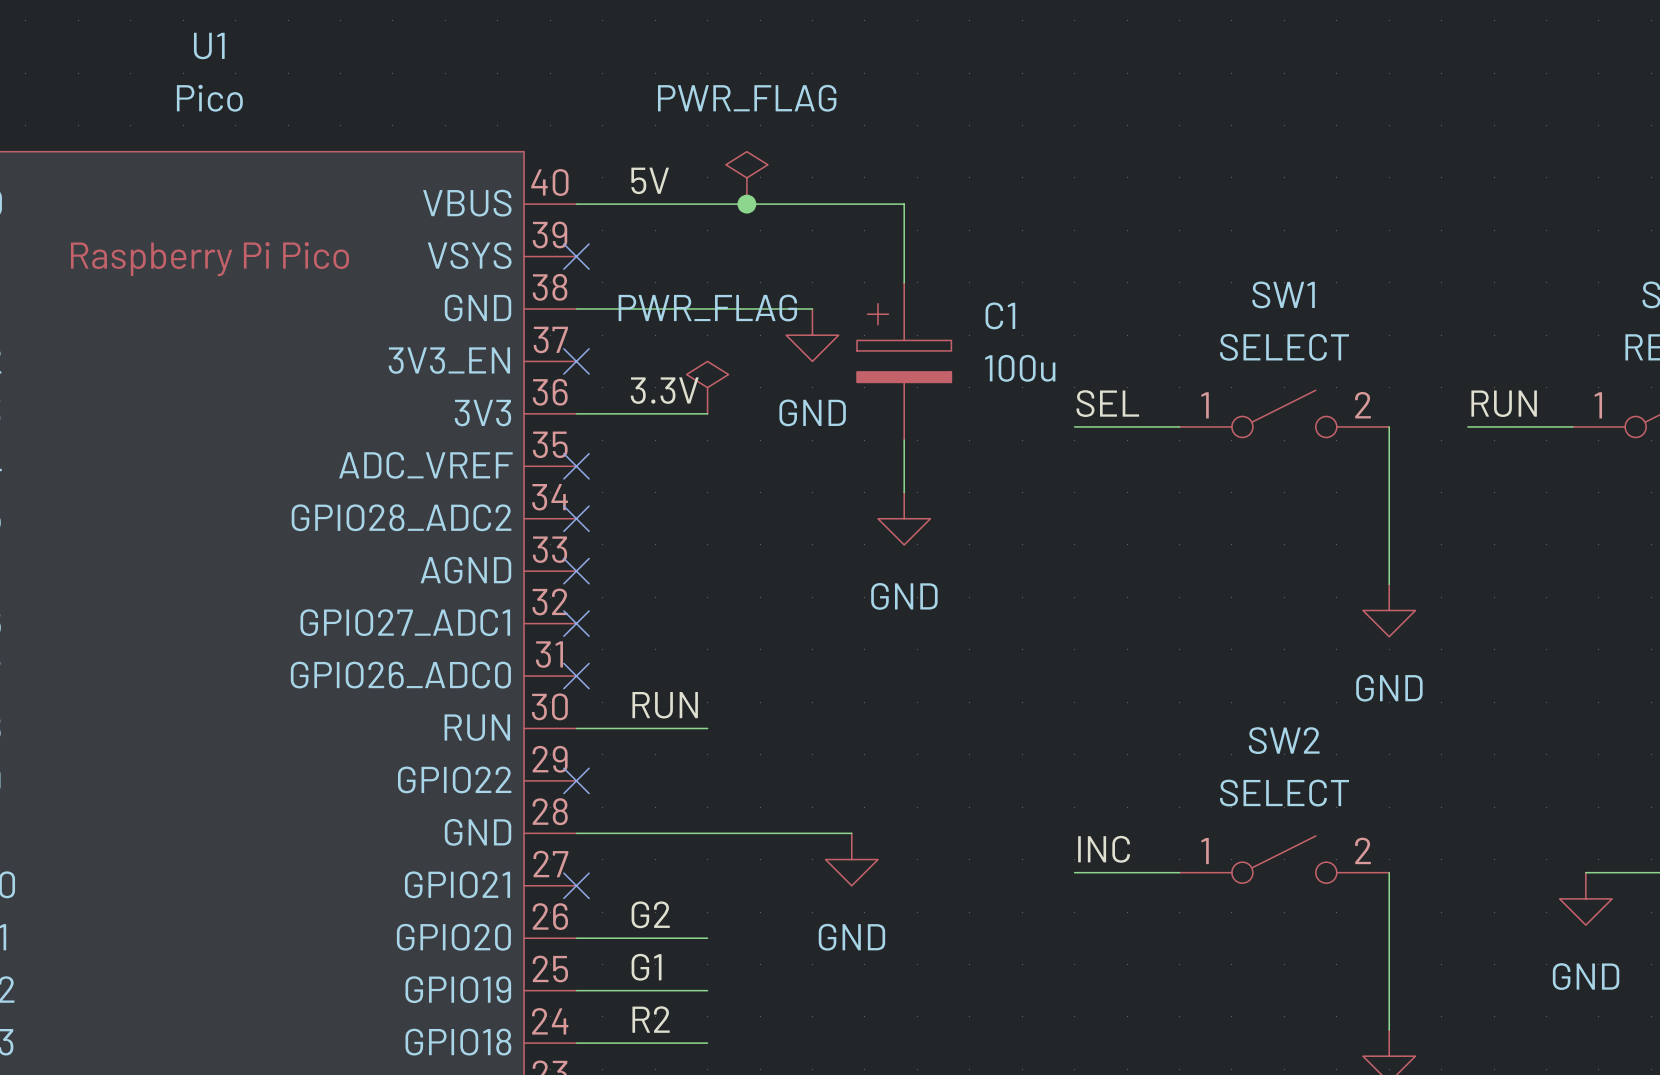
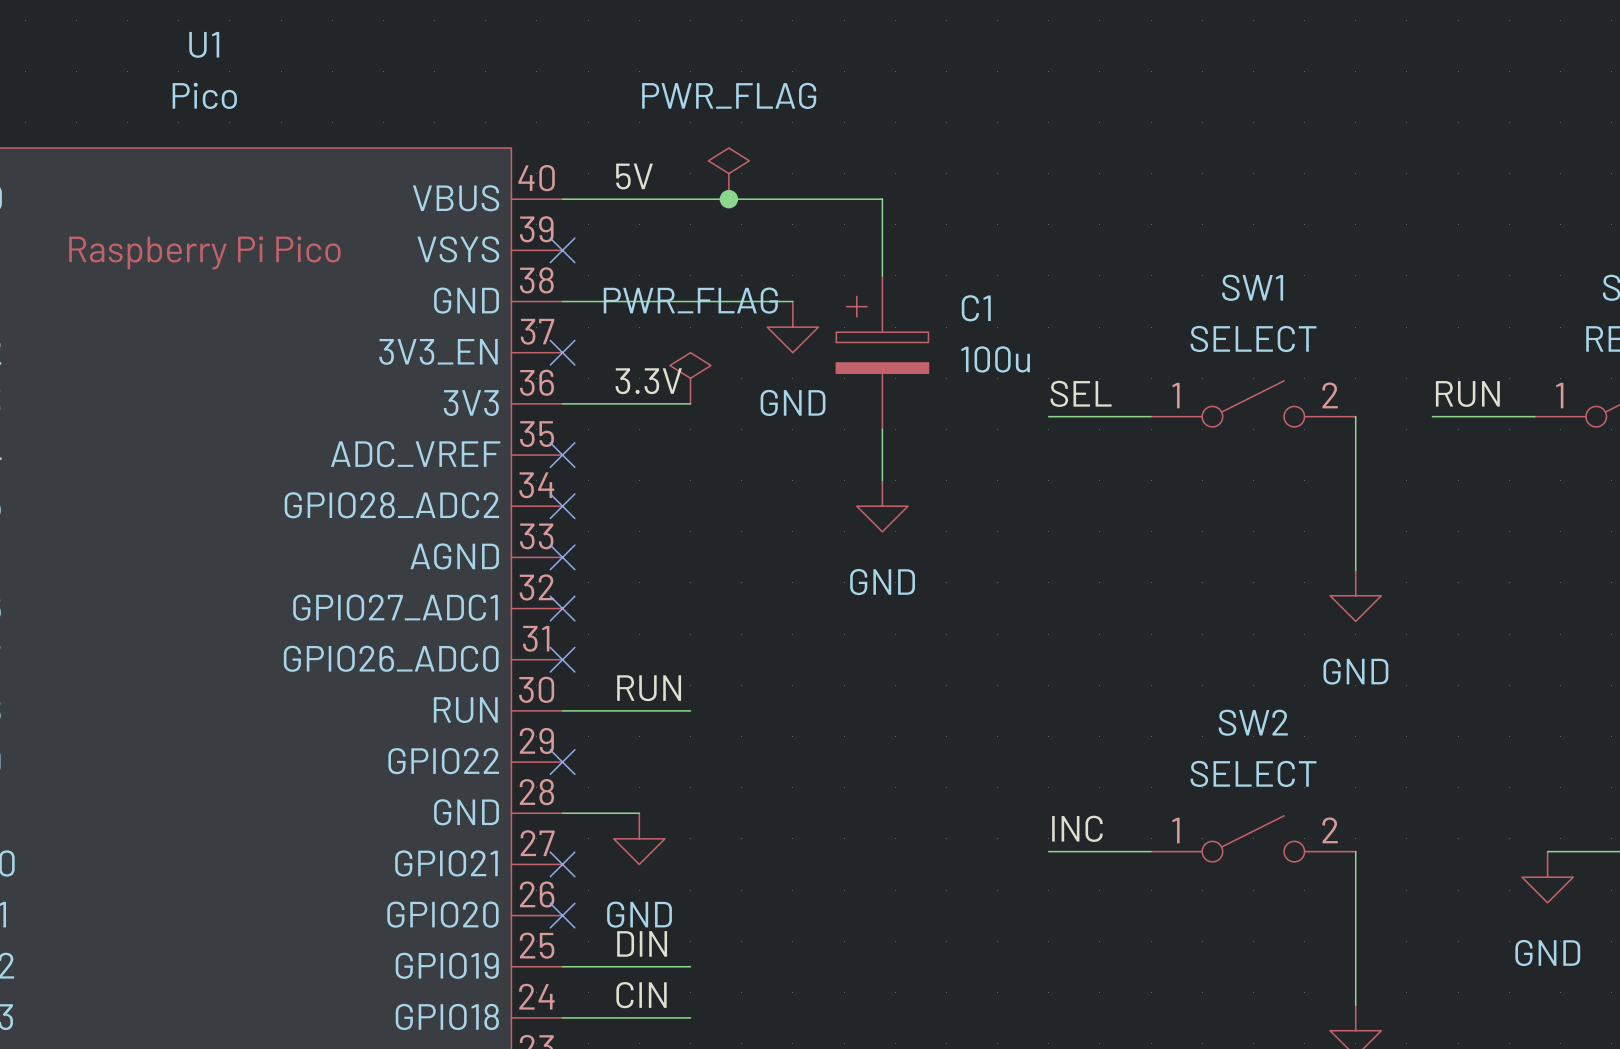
wire: (655, 833) (851, 833) -> none
power symbol: none -> GND (639, 838)
power symbol: GND (851, 859) -> none
label: G2 (650, 914) -> none
wire: (576, 938) (707, 938) -> none
no-connect mark: none -> (562, 915)
label: G1 (646, 967) -> DIN (642, 943)
label: R2 (651, 1019) -> CIN (641, 995)

